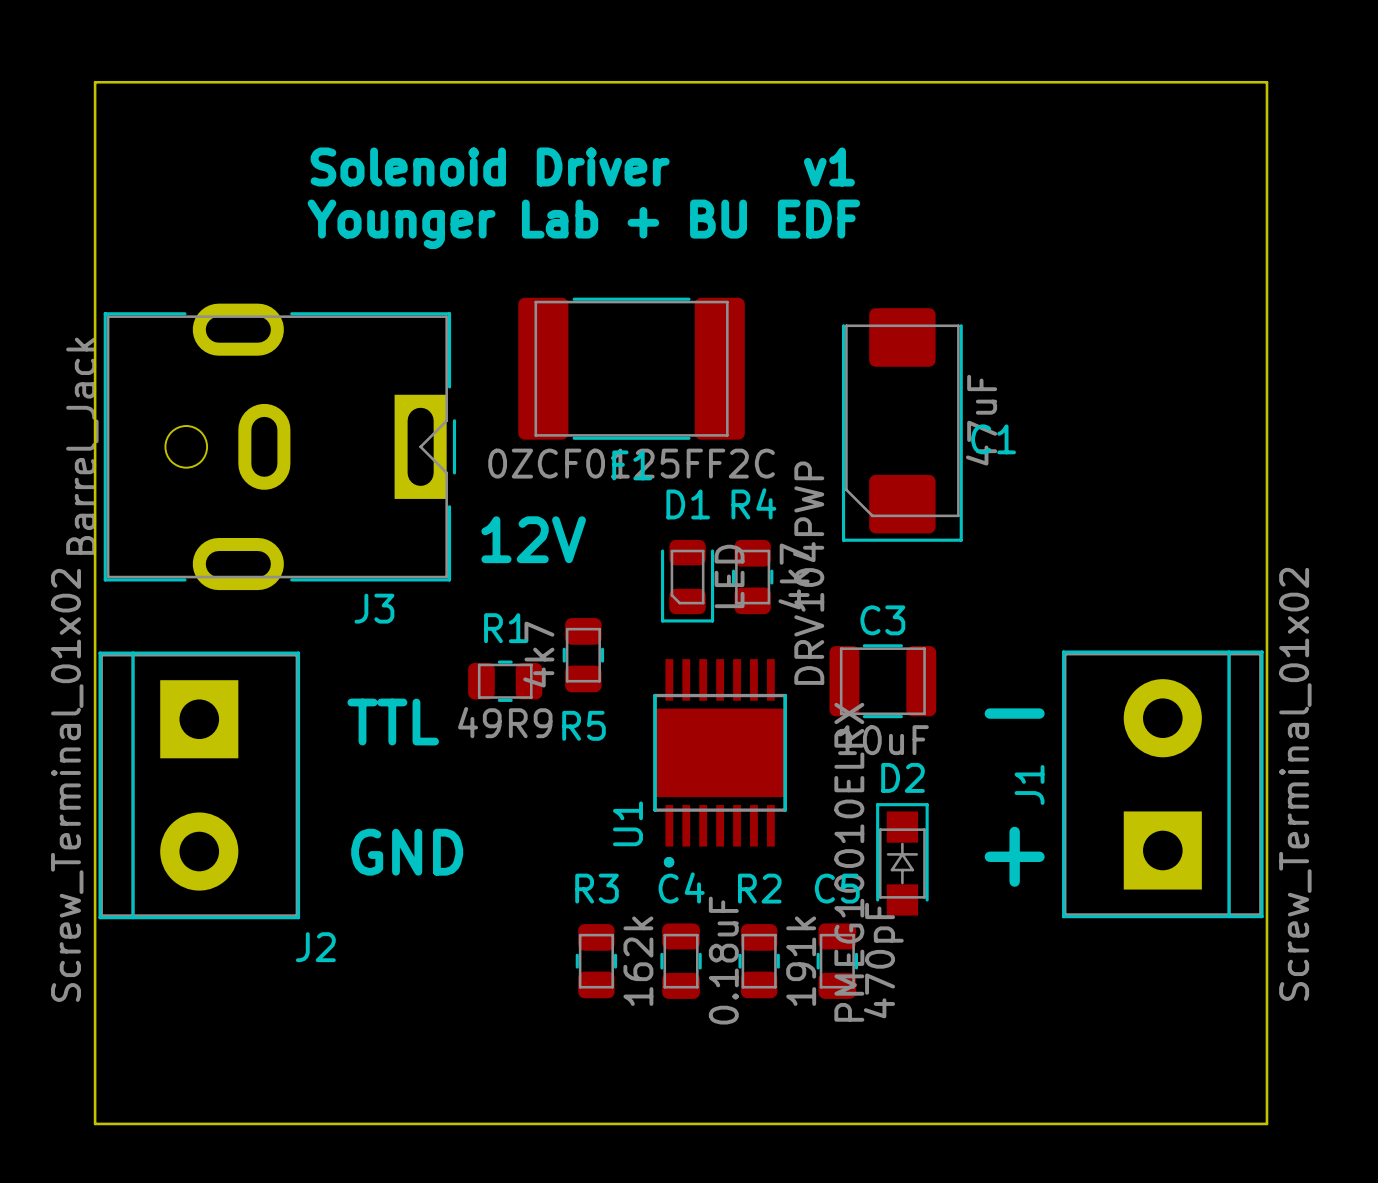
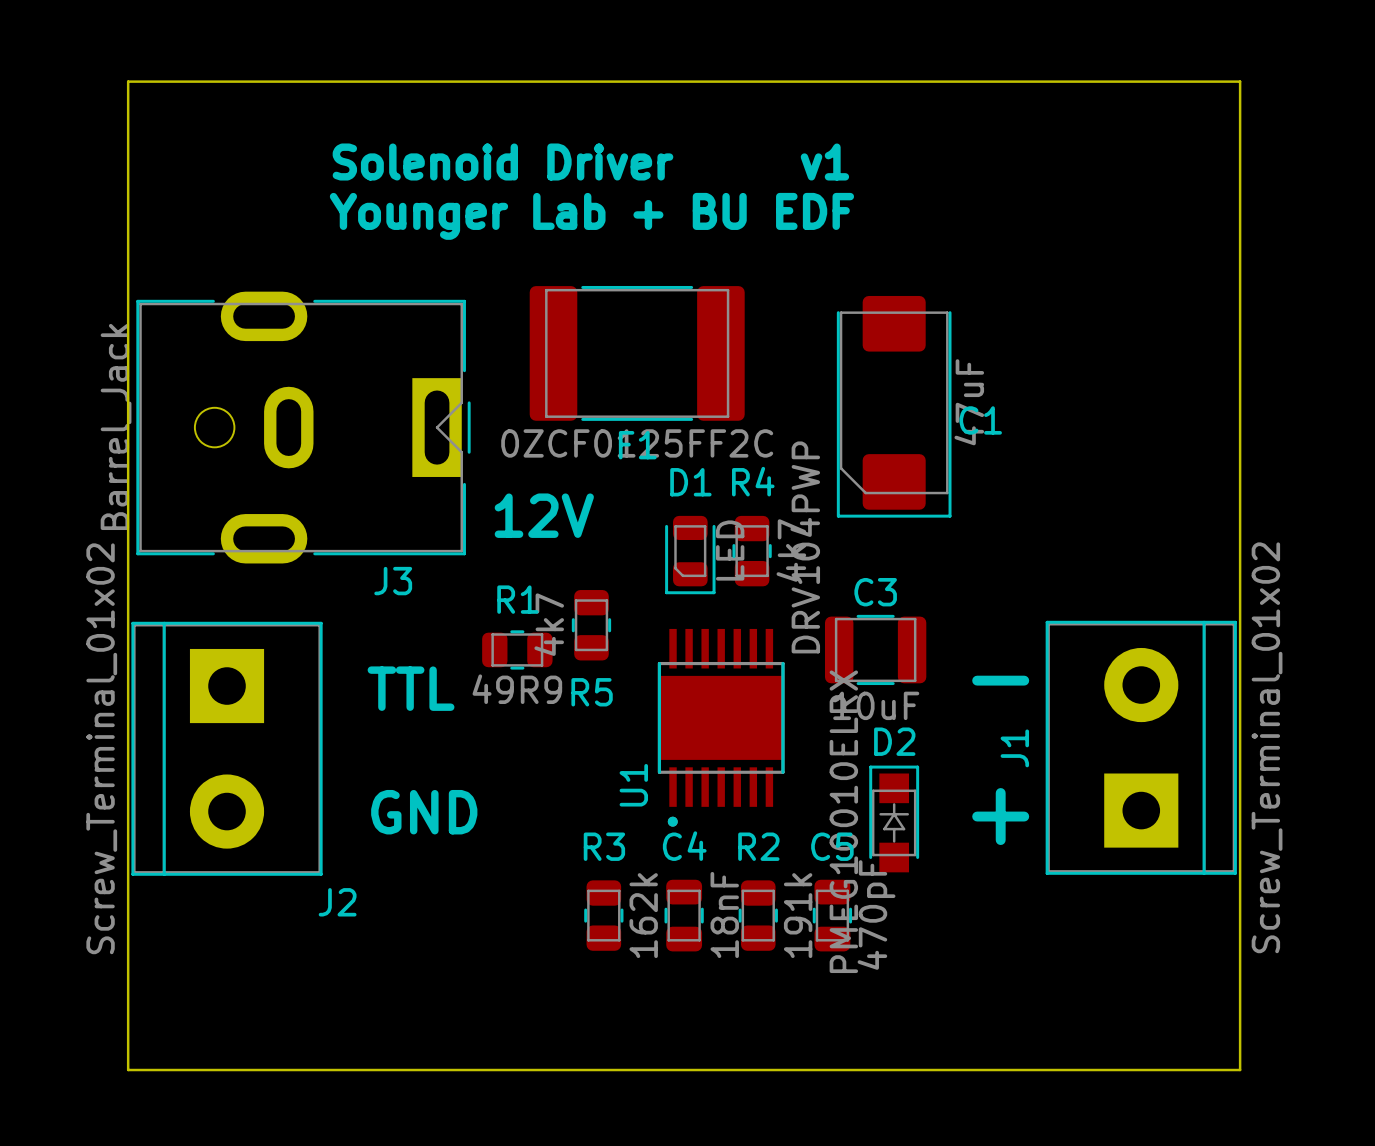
C4 value: 0.18uF (723, 960) -> 18nF (724, 914)

